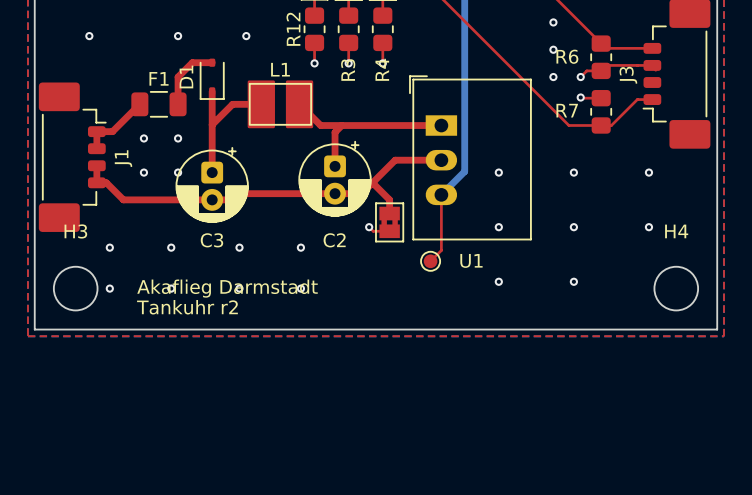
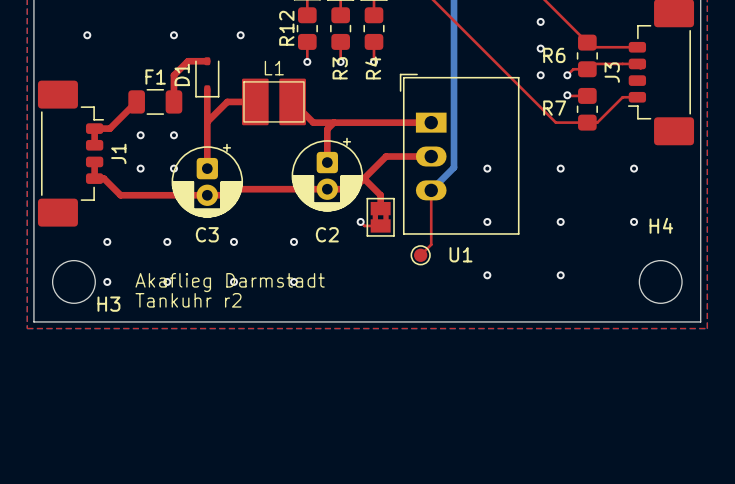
H3 name position: H3 (75, 231) -> H3 (108, 304)

